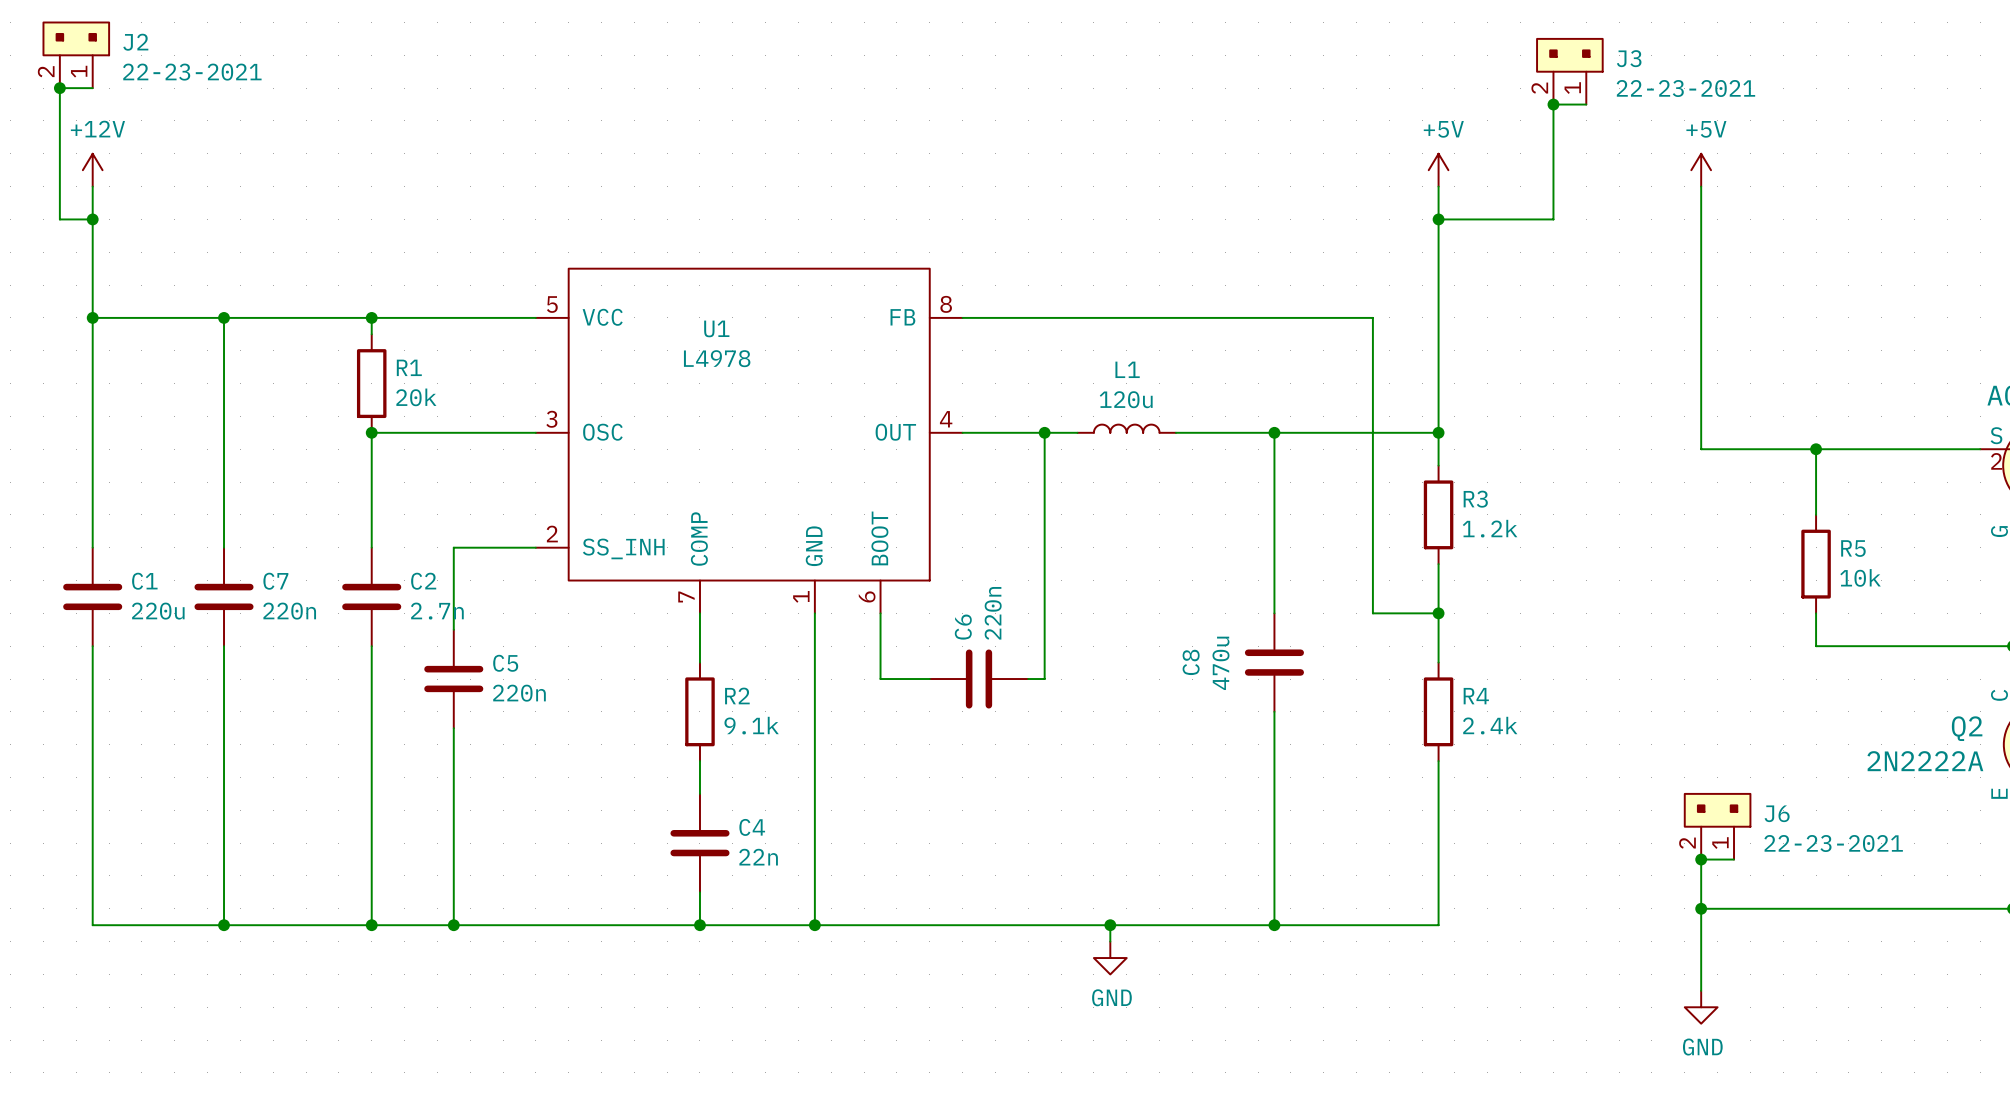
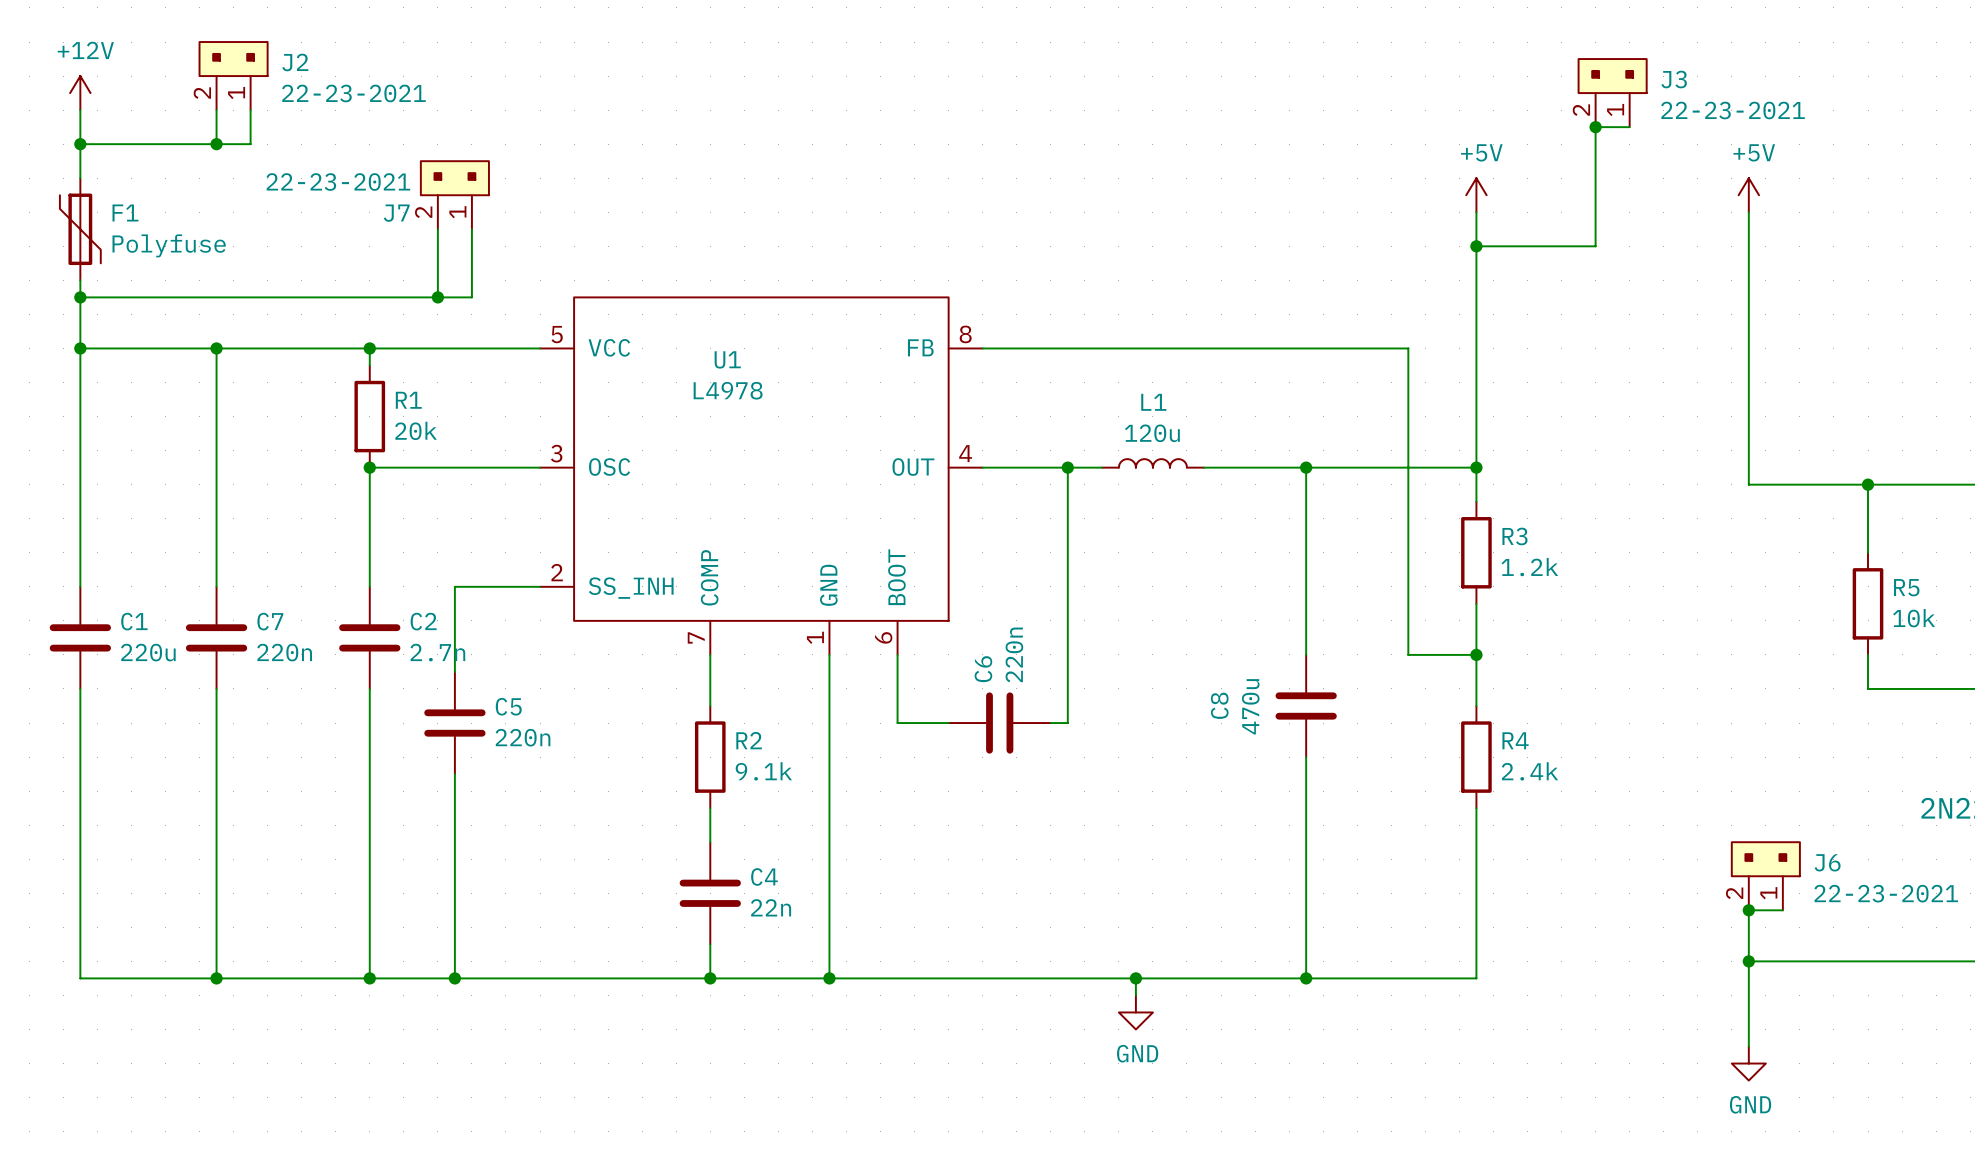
J2 position: (76, 55) -> (233, 76)
junction position: (59, 88) -> (80, 144)
wire: (92, 88) (59, 88) (59, 219) (92, 219) -> (80, 110) (80, 178)
wire: none -> (216, 110) (216, 144)
wire: none -> (250, 110) (250, 144) (80, 144)
junction: none -> (216, 144)
power symbol position: +12V (92, 170) -> +12V (80, 93)
J7: none -> 22-23-2021 (454, 195)
F1: none -> Polyfuse (80, 229)
wire: none -> (437, 229) (437, 297)
wire: none -> (471, 229) (471, 297) (80, 297)
junction: (92, 219) -> none
junction: none -> (80, 297)
junction: none -> (437, 297)

